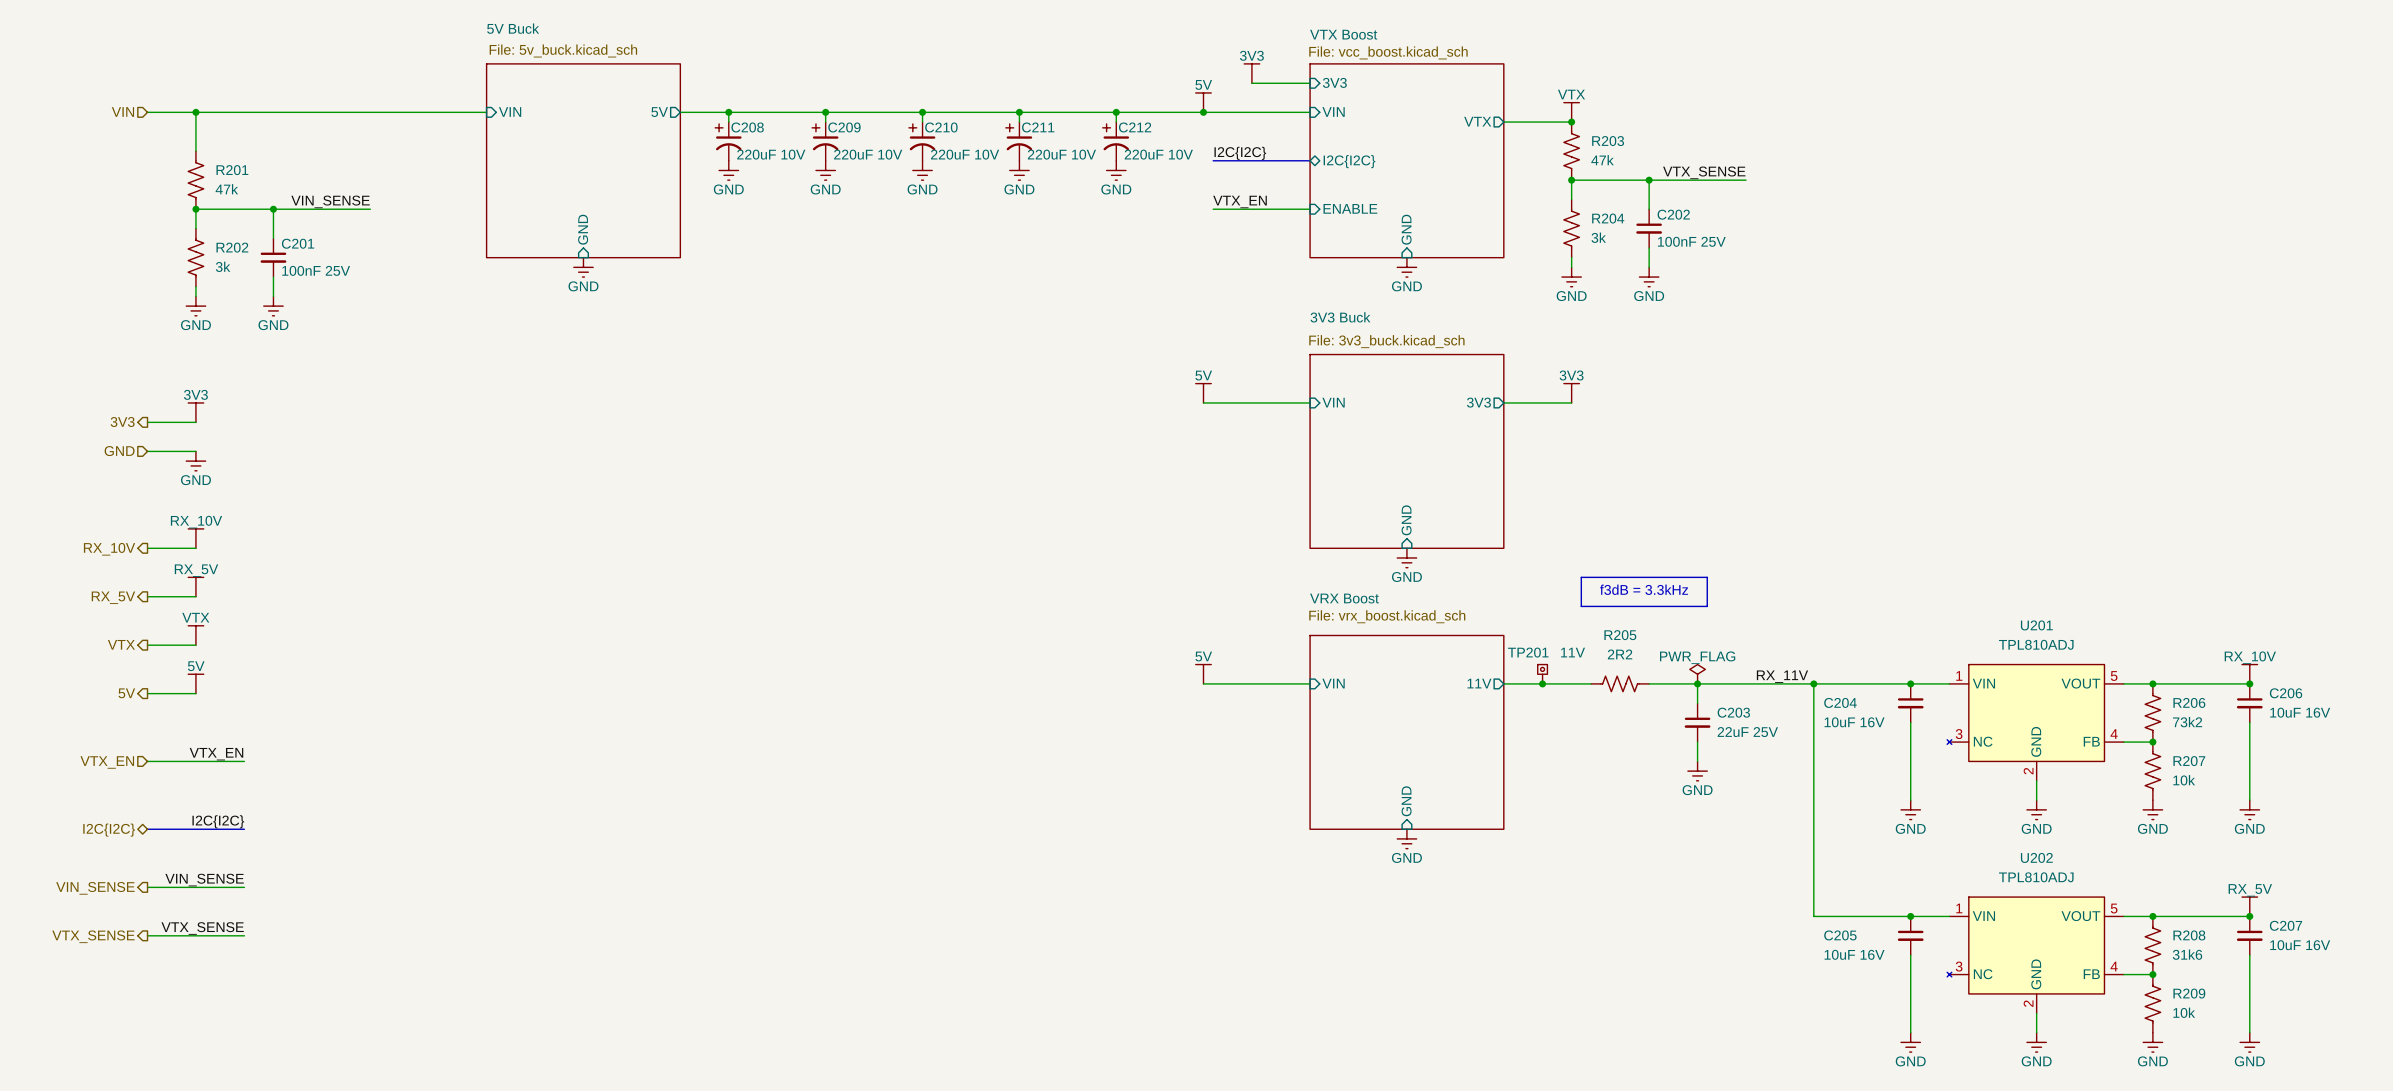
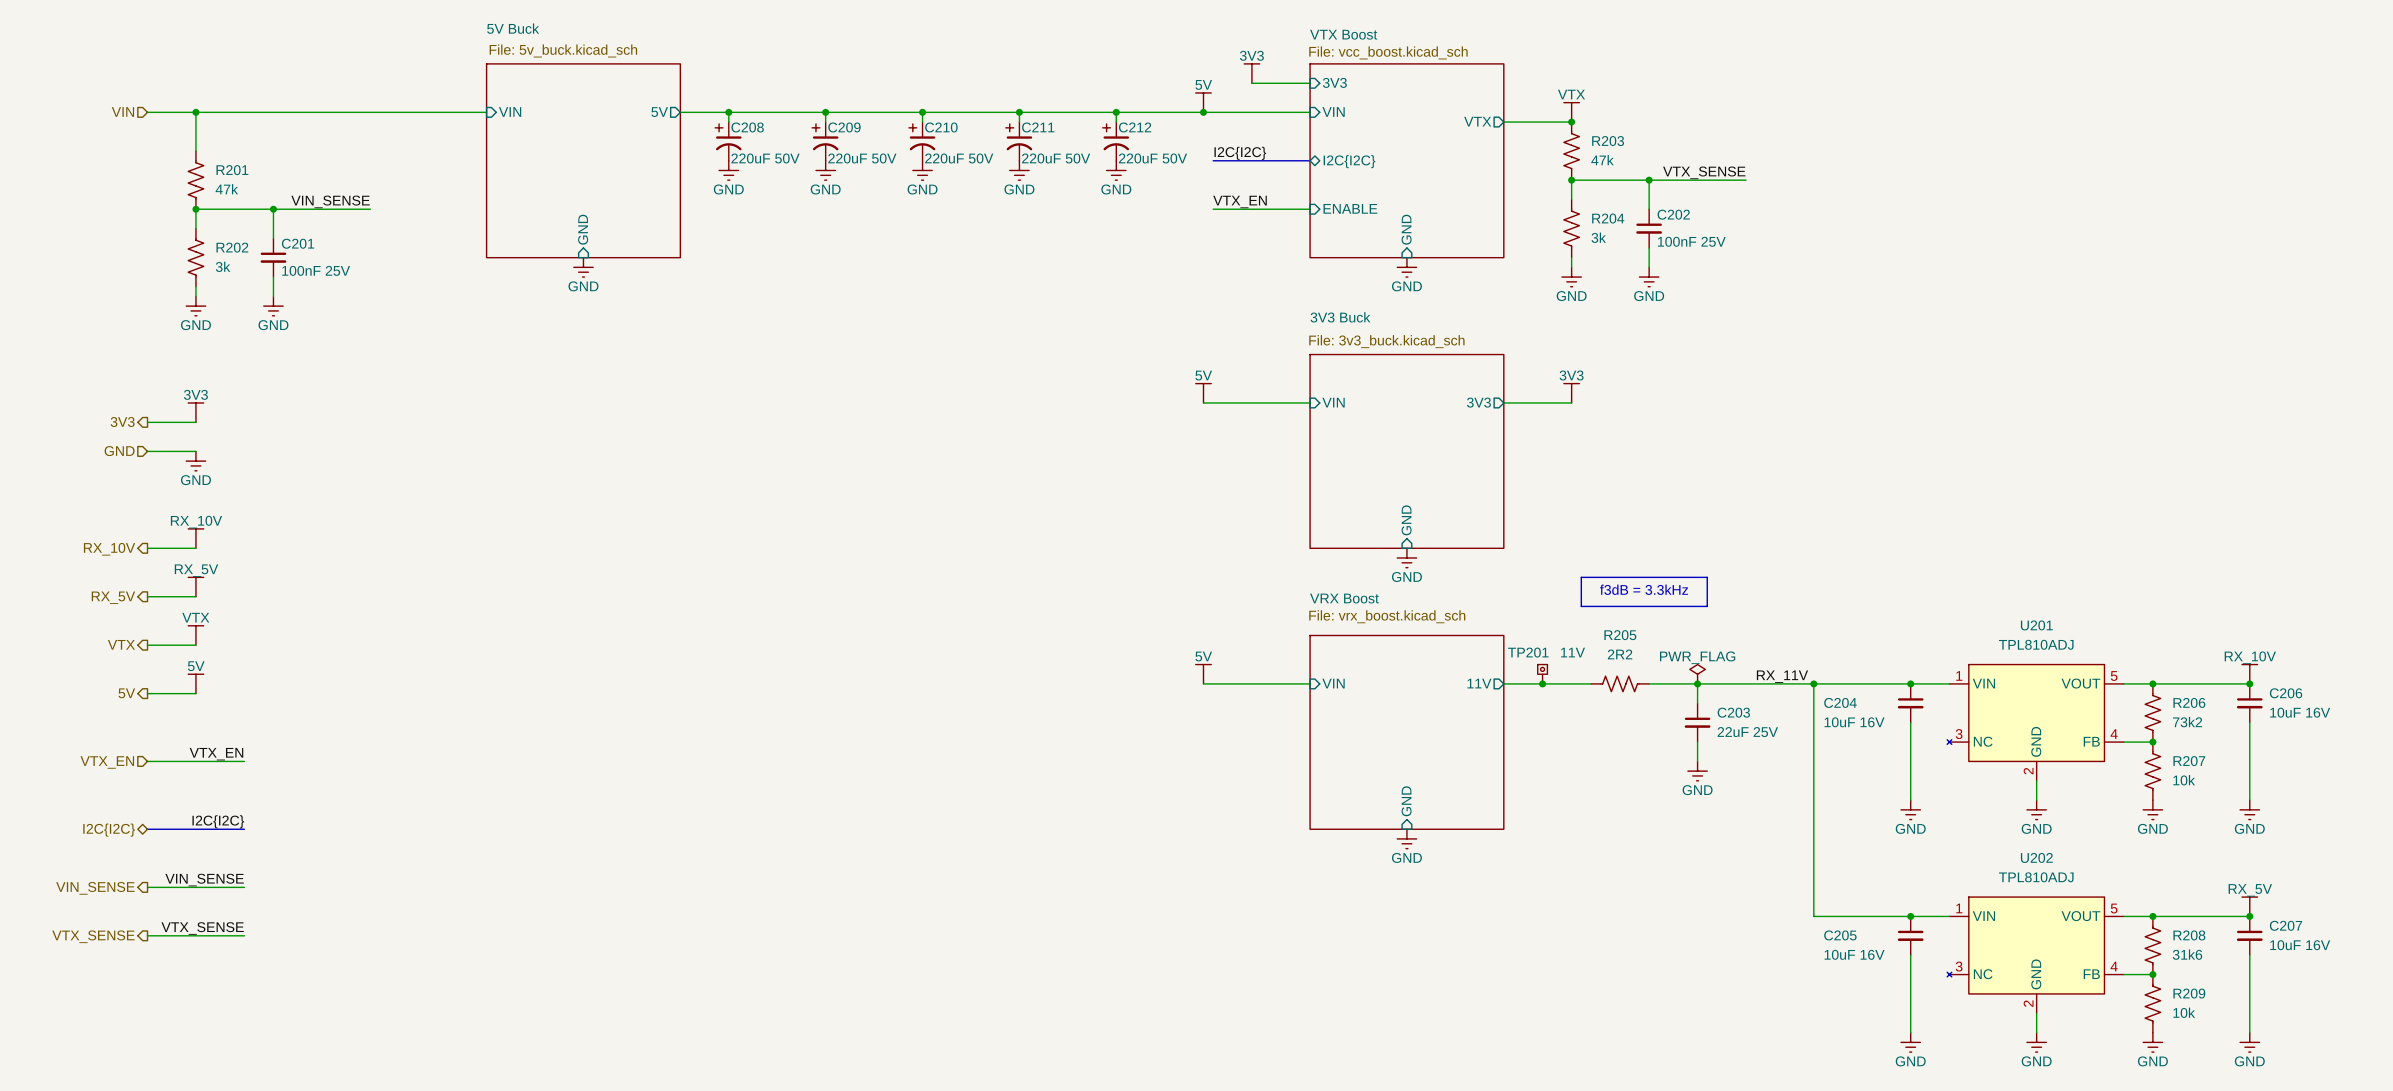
C208 value: 220uF 10V (771, 154) -> 220uF 50V (765, 158)
C209 value: 220uF 10V (868, 154) -> 220uF 50V (862, 158)
C210 value: 220uF 10V (965, 154) -> 220uF 50V (959, 158)
C211 value: 220uF 10V (1061, 154) -> 220uF 50V (1056, 158)
C212 value: 220uF 10V (1158, 154) -> 220uF 50V (1153, 158)

